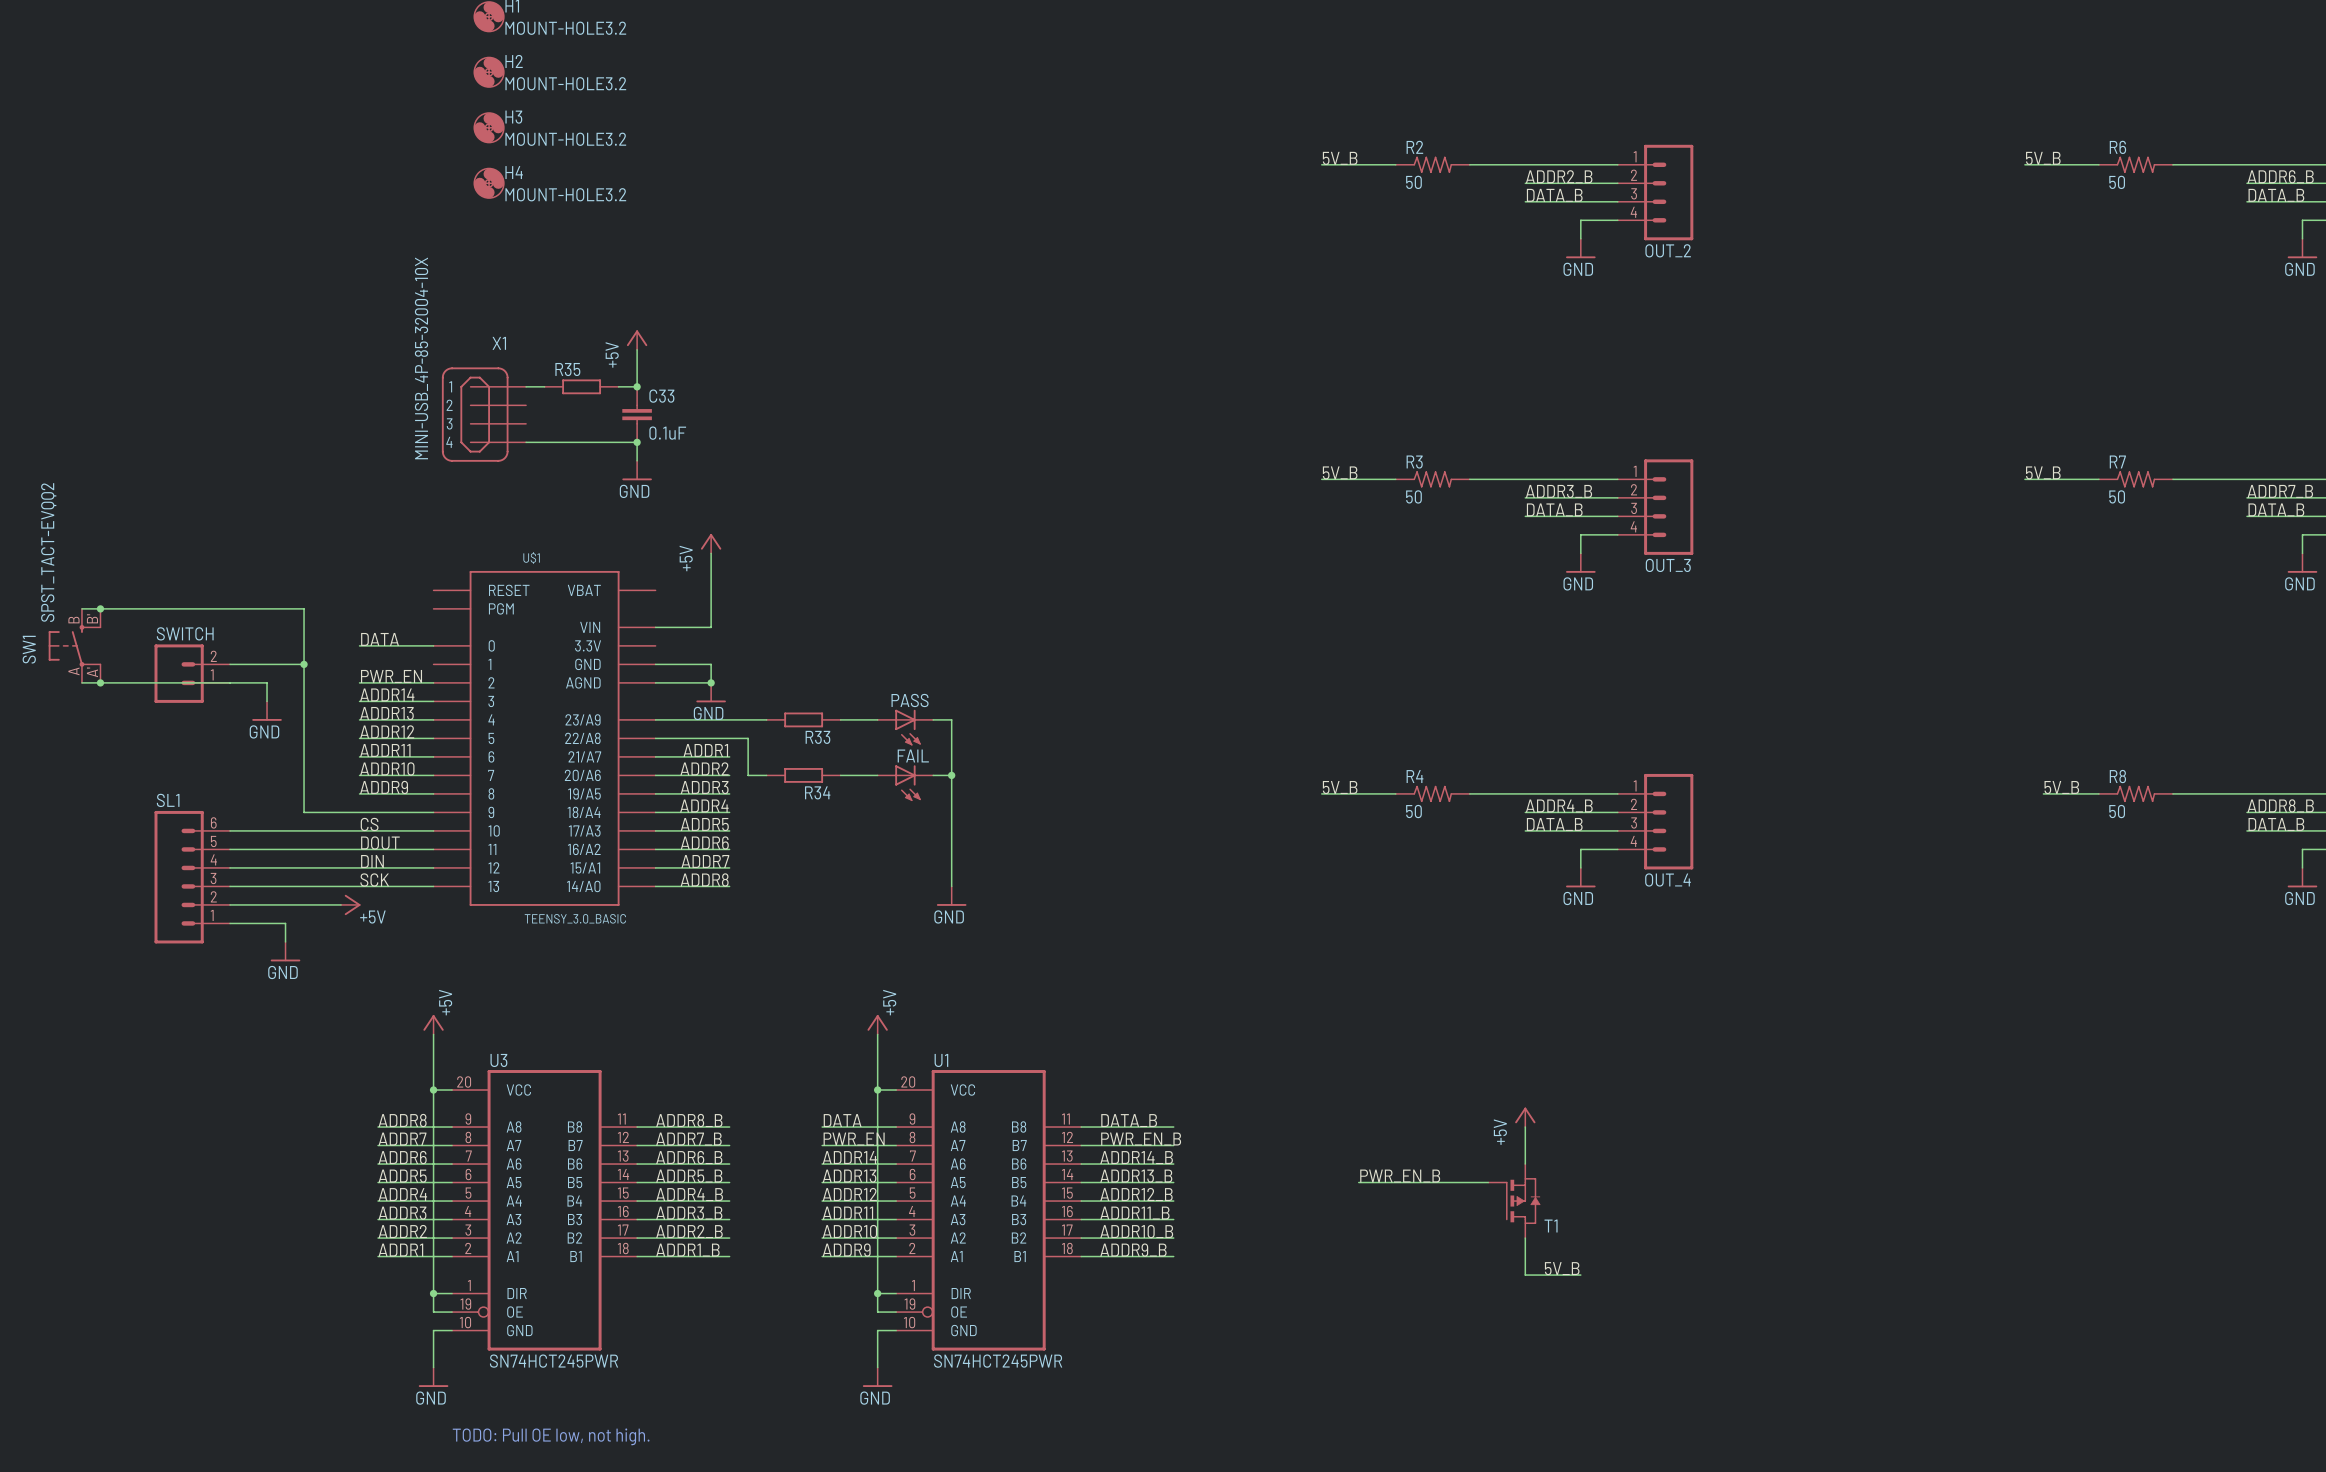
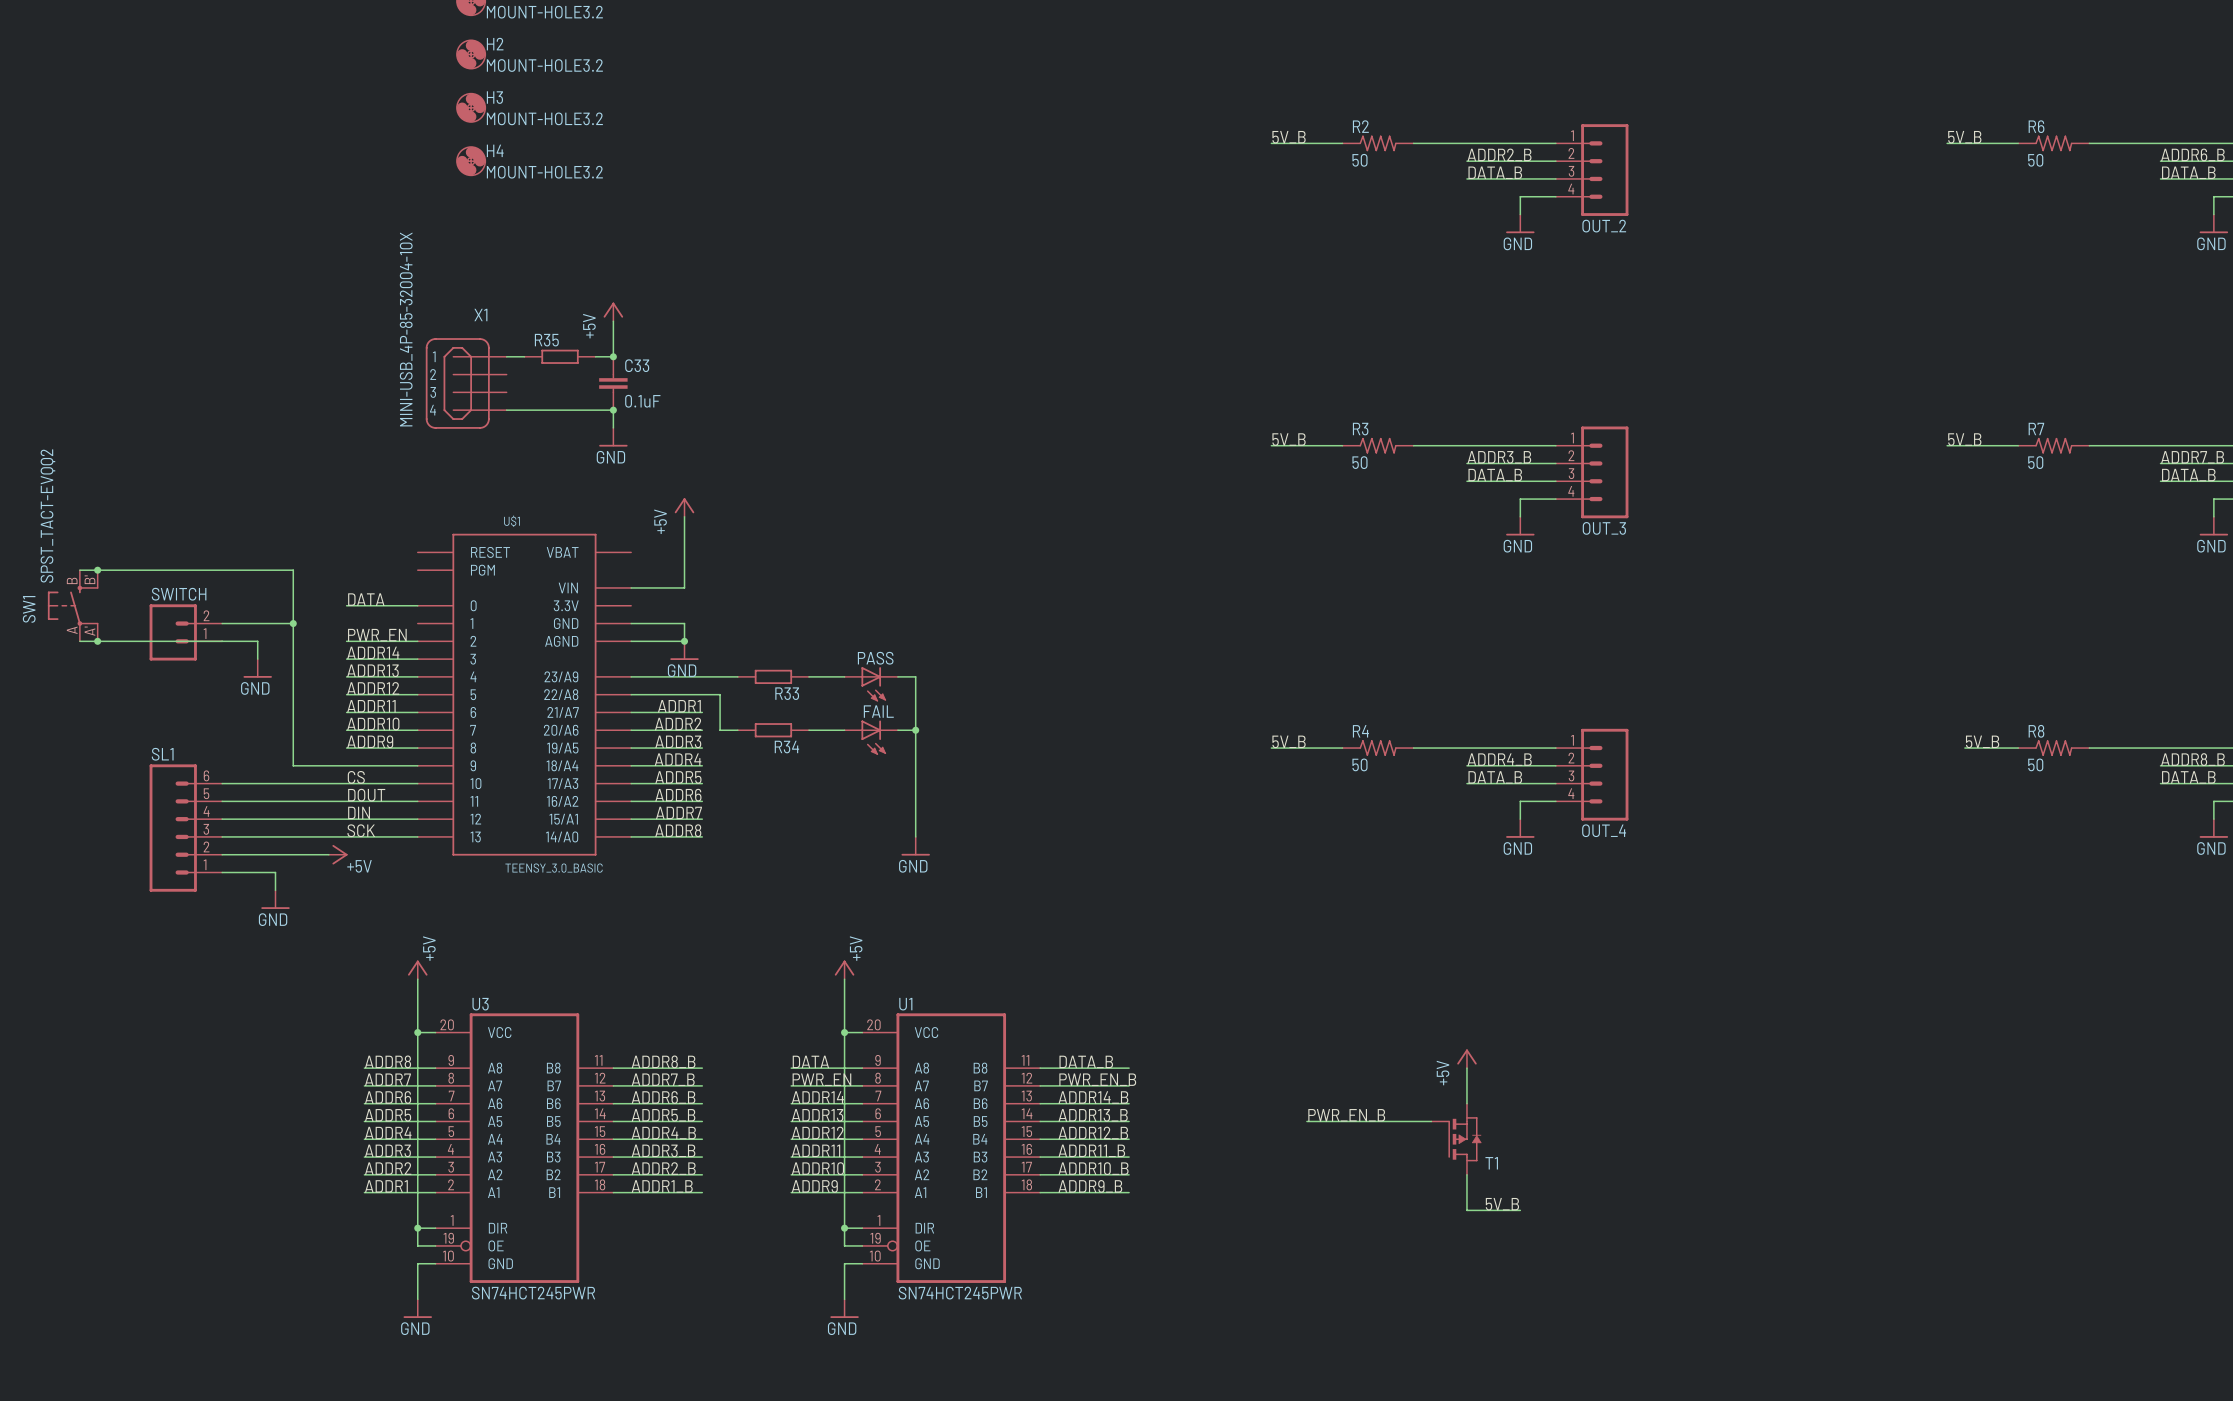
text: TODO: Pull OE low, not high. (551, 1436) -> none

